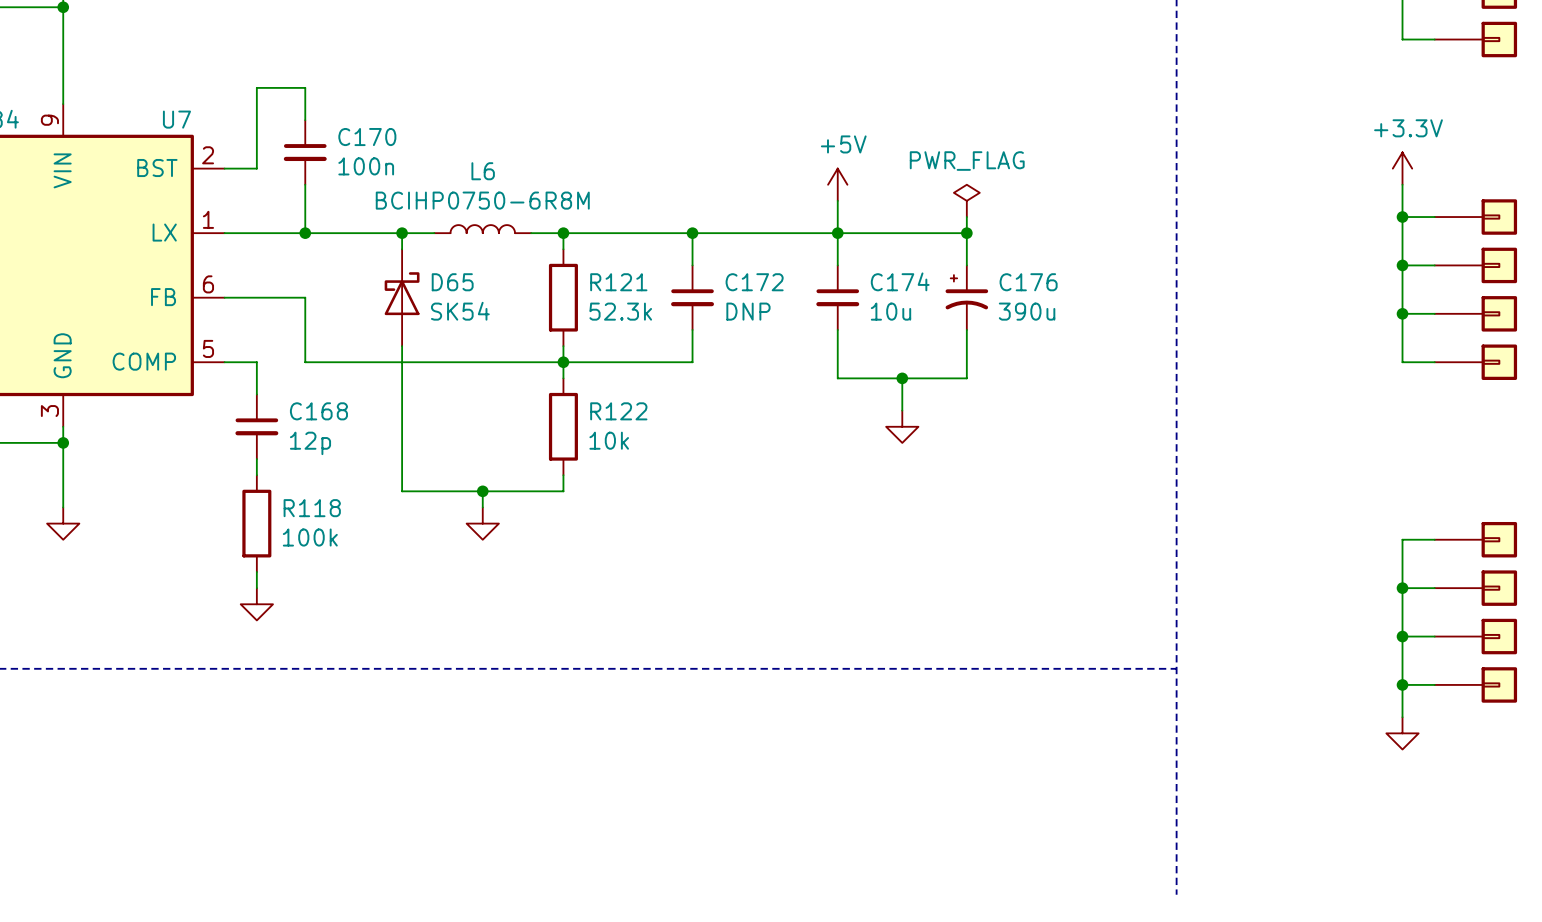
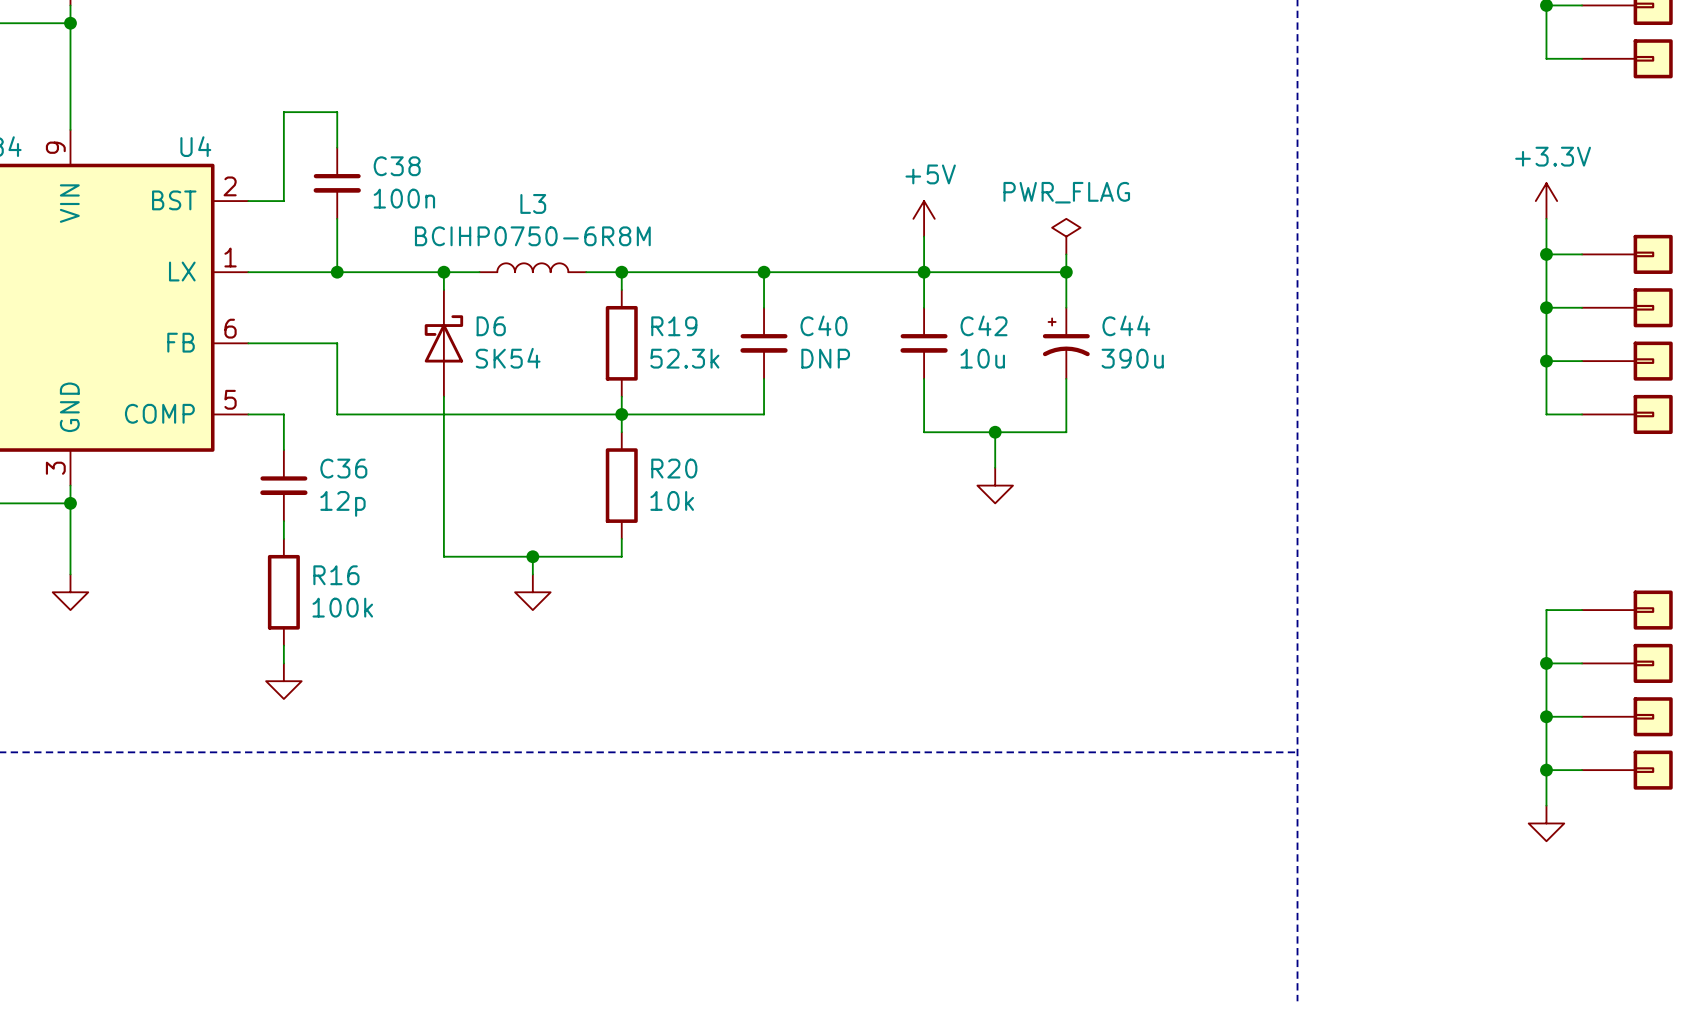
U7 name: U7 (176, 119) -> U4 (195, 146)
C170 name: C170 (367, 137) -> C38 (397, 166)
L6 name: L6 (483, 171) -> L3 (533, 203)
C174 name: C174 (900, 281) -> C42 (984, 325)
D65 name: D65 (452, 282) -> D6 (491, 326)
R121 name: R121 (618, 282) -> R19 (674, 326)
C172 name: C172 (754, 282) -> C40 (823, 325)
C176 name: C176 (1028, 282) -> C44 (1126, 325)
C168 name: C168 (318, 411) -> C36 (343, 468)
R122 name: R122 (618, 411) -> R20 (674, 468)
R118 name: R118 (312, 508) -> R16 (336, 575)

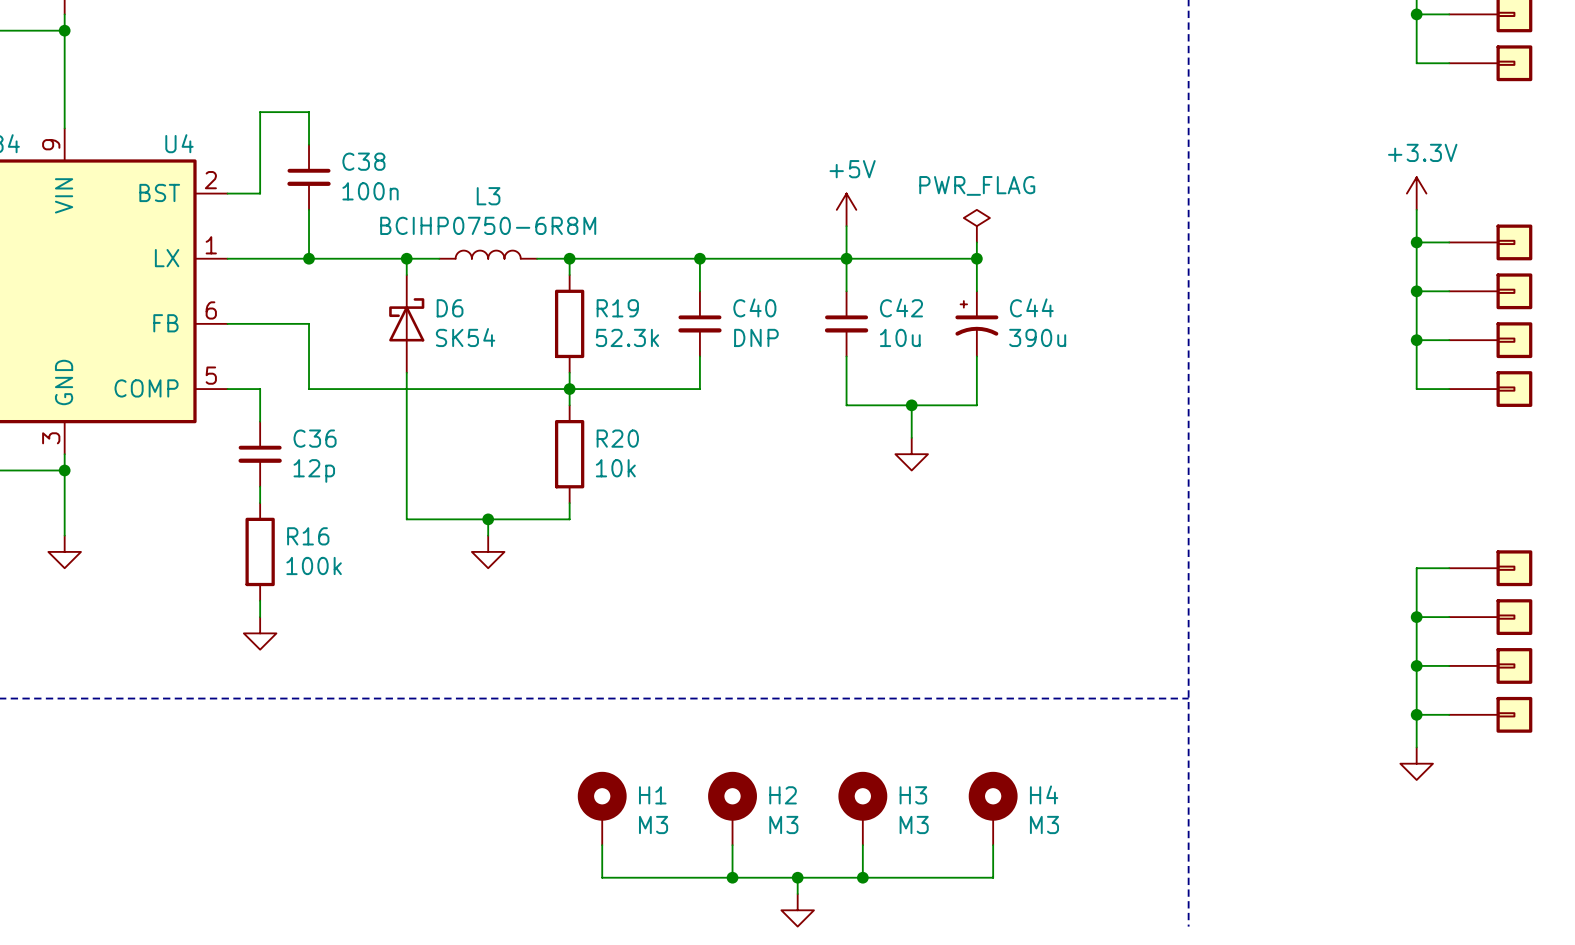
H1: none -> M3 (602, 808)
H2: none -> M3 (732, 808)
H3: none -> M3 (862, 808)
H4: none -> M3 (993, 808)
wire: none -> (602, 845) (602, 877) (993, 877) (993, 845)
wire: none -> (732, 845) (732, 877)
wire: none -> (862, 845) (862, 877)
junction: none -> (732, 877)
wire: none -> (797, 877) (797, 894)
junction: none -> (797, 877)
junction: none -> (862, 877)
power symbol: none -> (797, 910)

